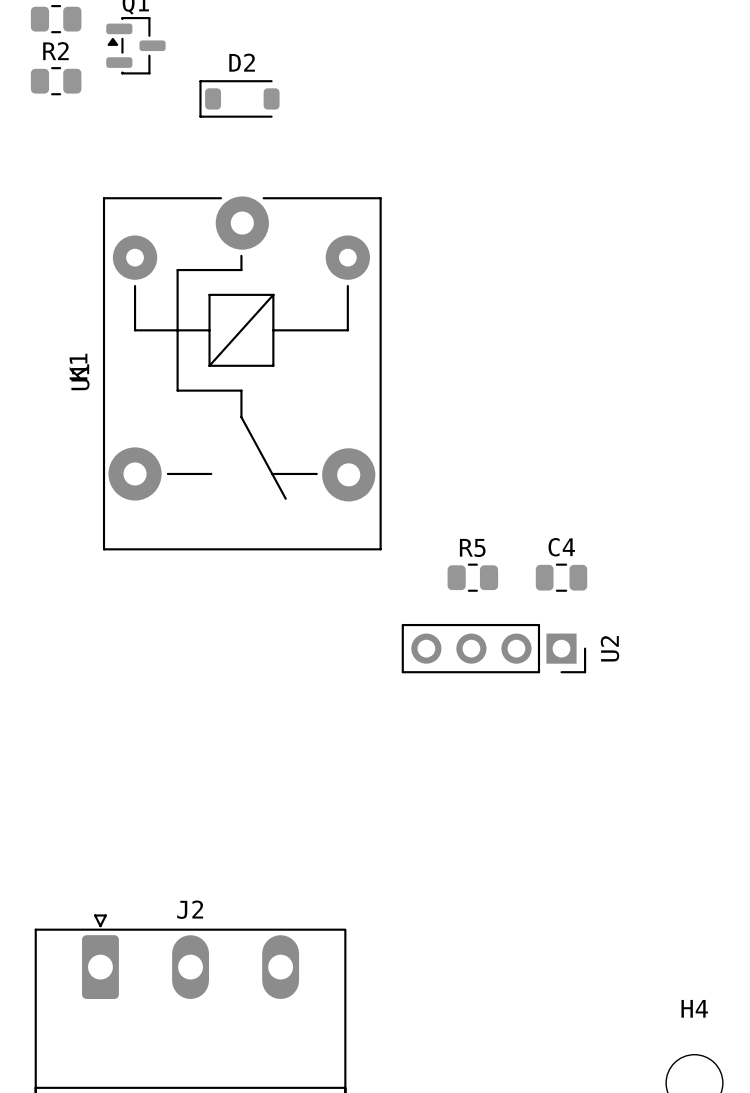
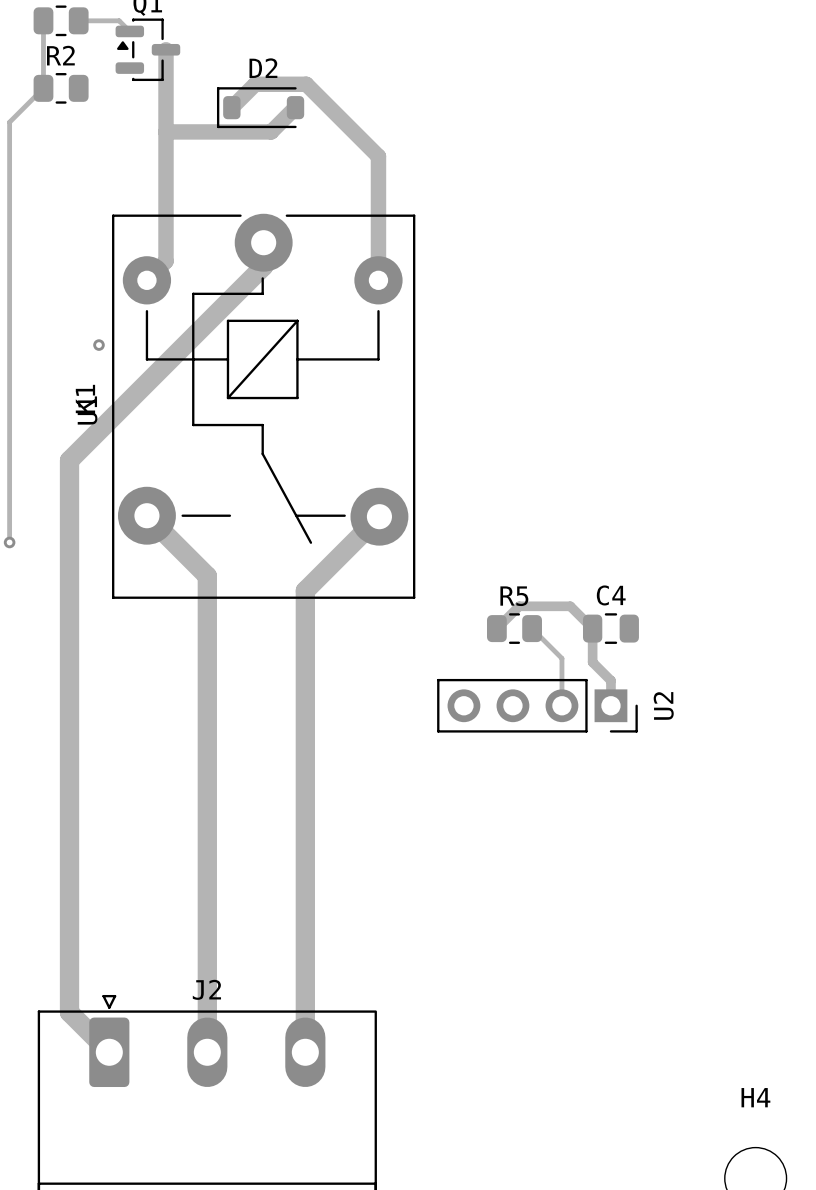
track: none -> (43, 20) (43, 88) (9, 122) (9, 542)
track: none -> (78, 20) (119, 20) (129, 31)
track: none -> (166, 49) (166, 261) (146, 280)
track: none -> (231, 107) (255, 84) (306, 84) (378, 156) (378, 280)
track: none -> (295, 107) (271, 131) (166, 131)
track: none -> (263, 242) (263, 266) (69, 460) (69, 1012) (109, 1052)
via: none -> (98, 345)
track: none -> (146, 515) (207, 576) (207, 1052)
track: none -> (379, 516) (305, 590) (305, 1052)
via: none -> (9, 542)
track: none -> (496, 628) (519, 606) (570, 606) (592, 628) (592, 662) (610, 680) (610, 705)
track: none -> (532, 628) (561, 658) (561, 705)

